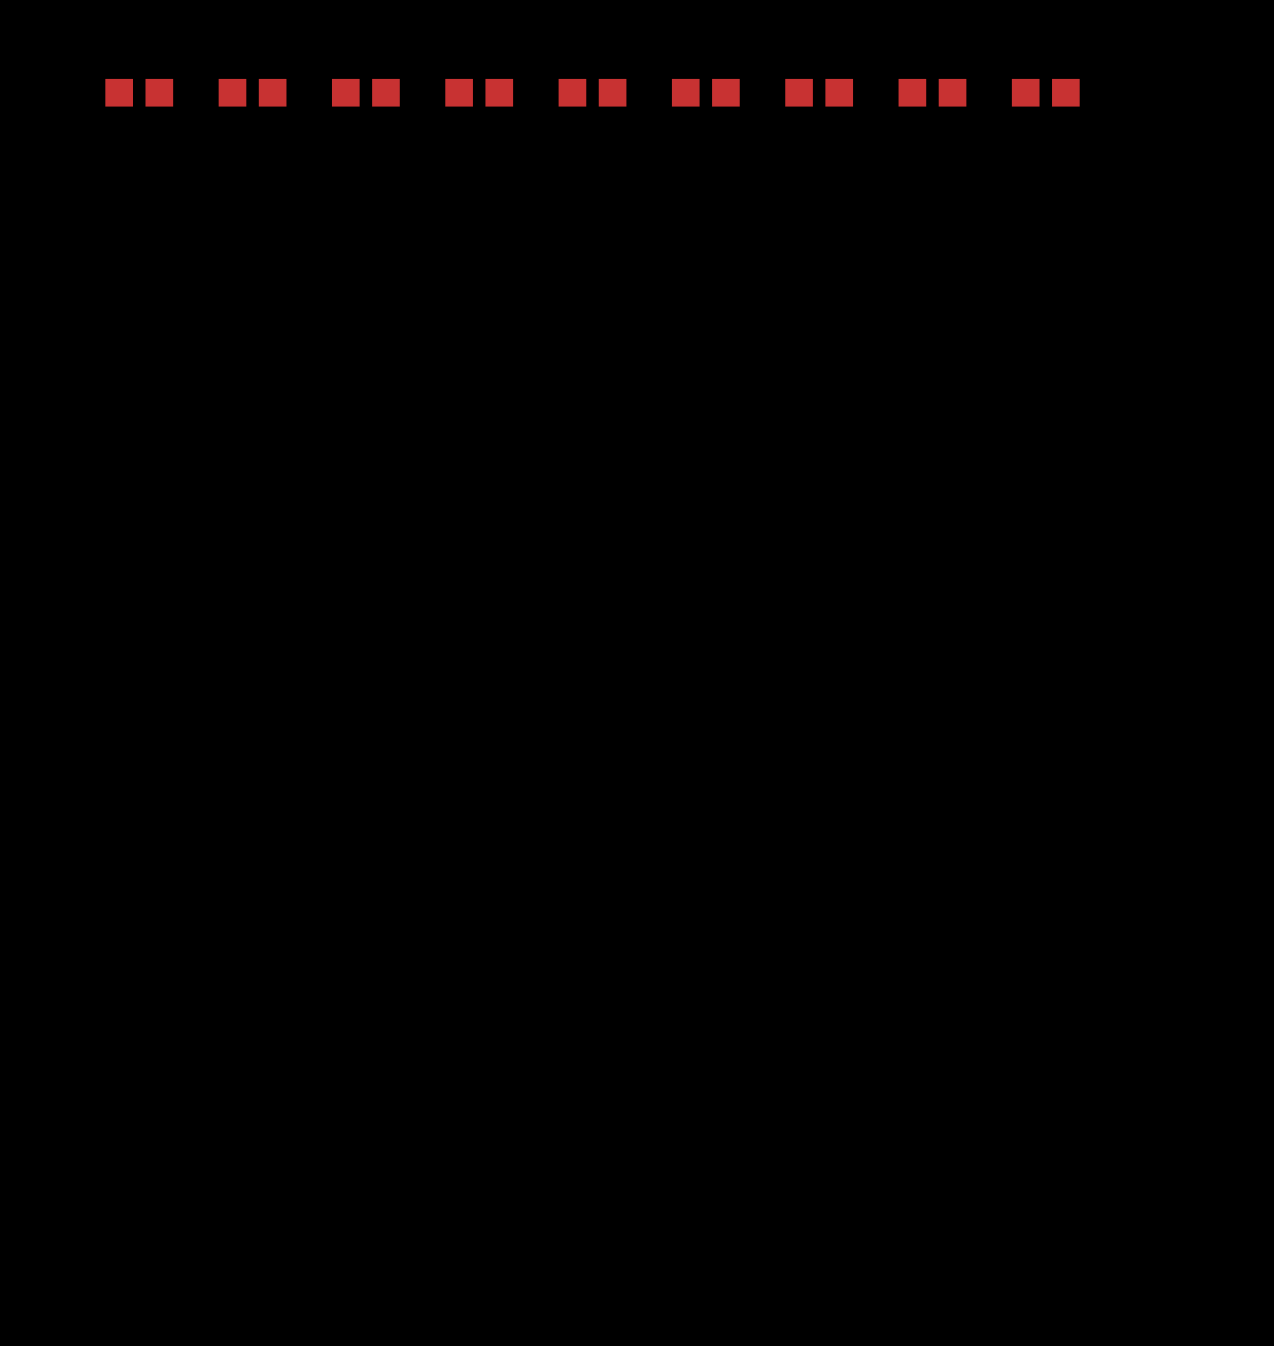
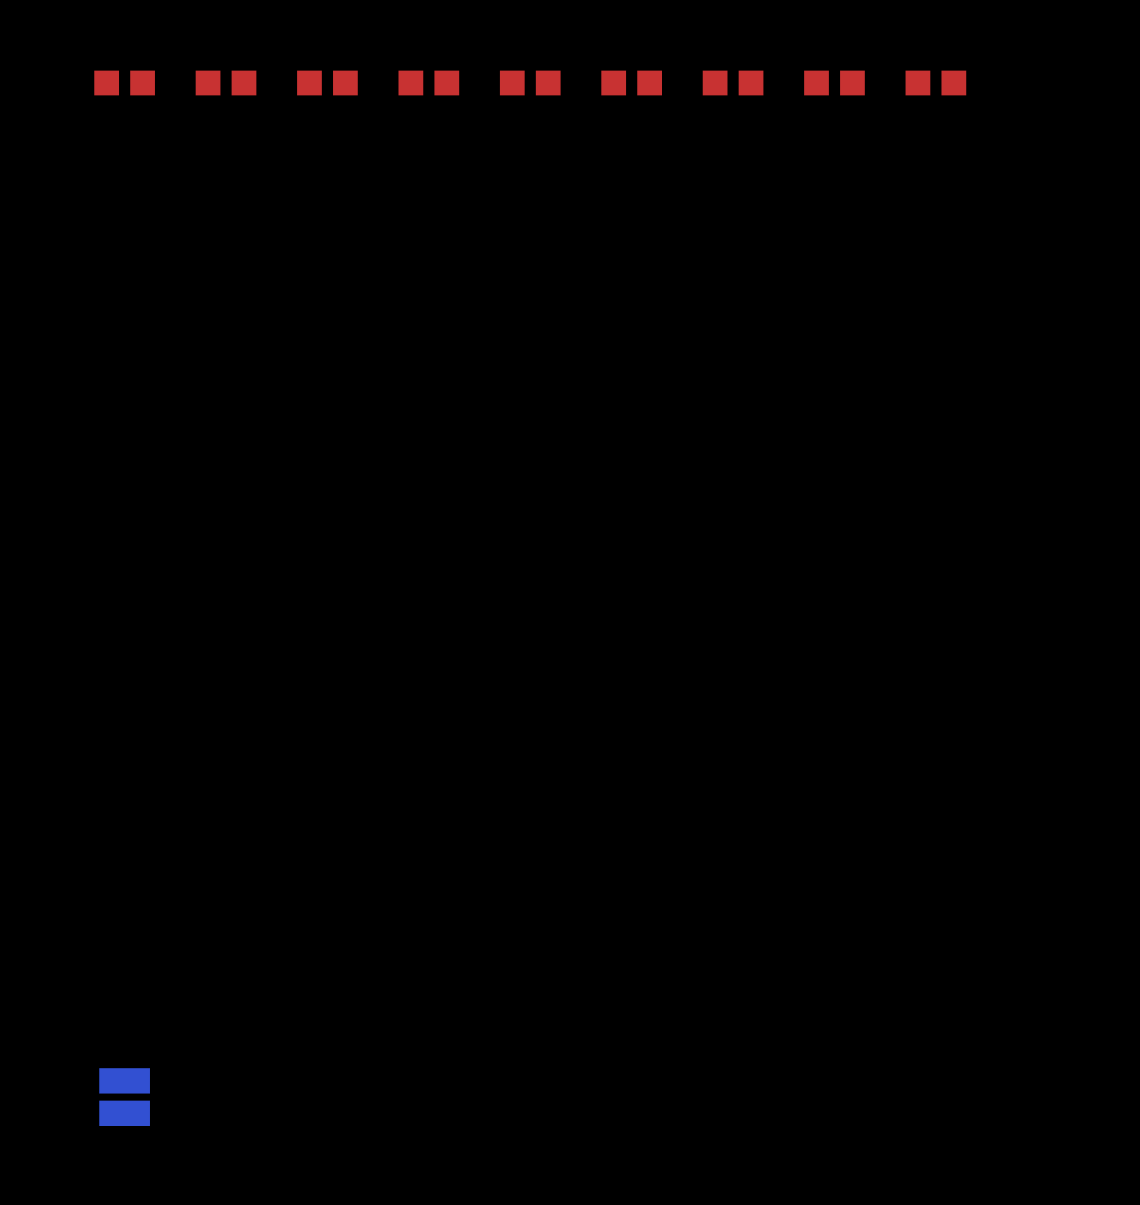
part: none -> (124, 1097)

